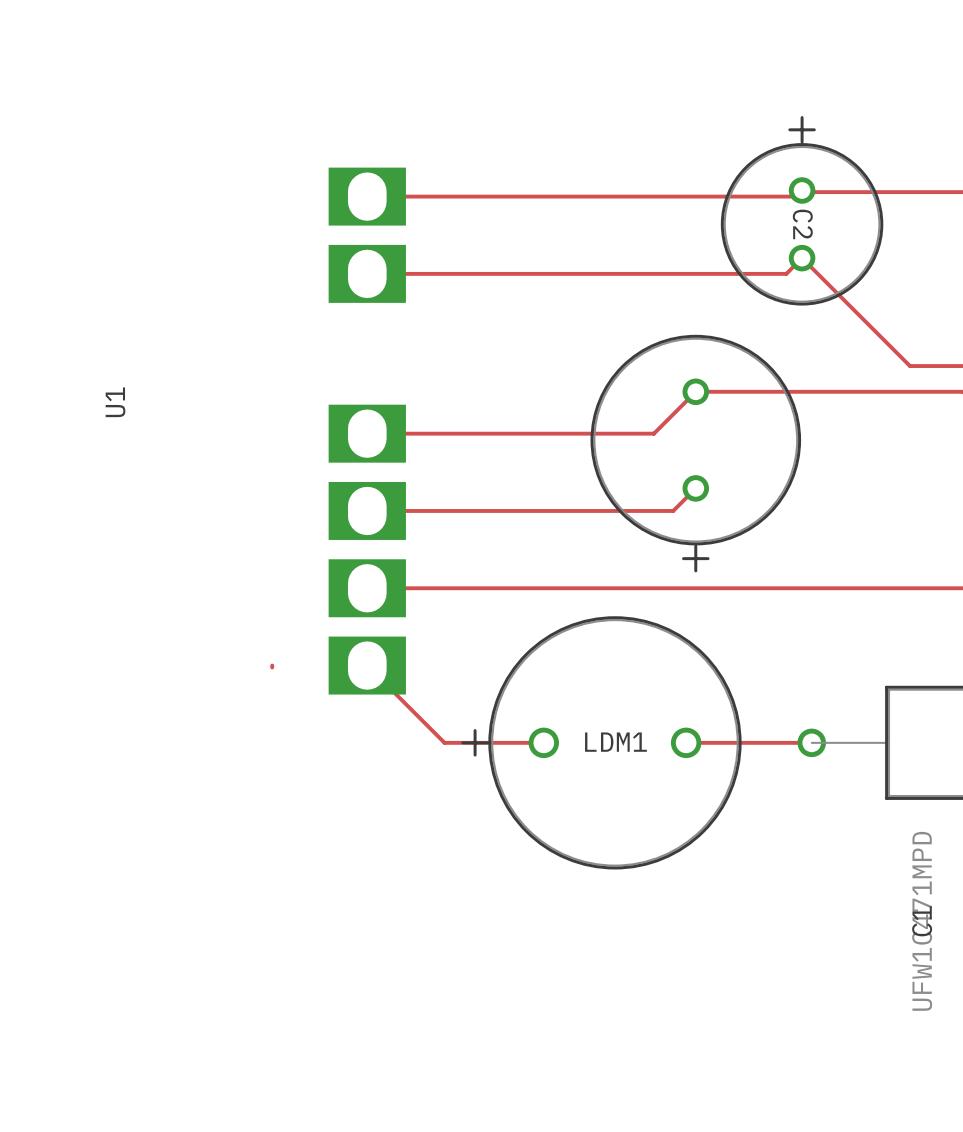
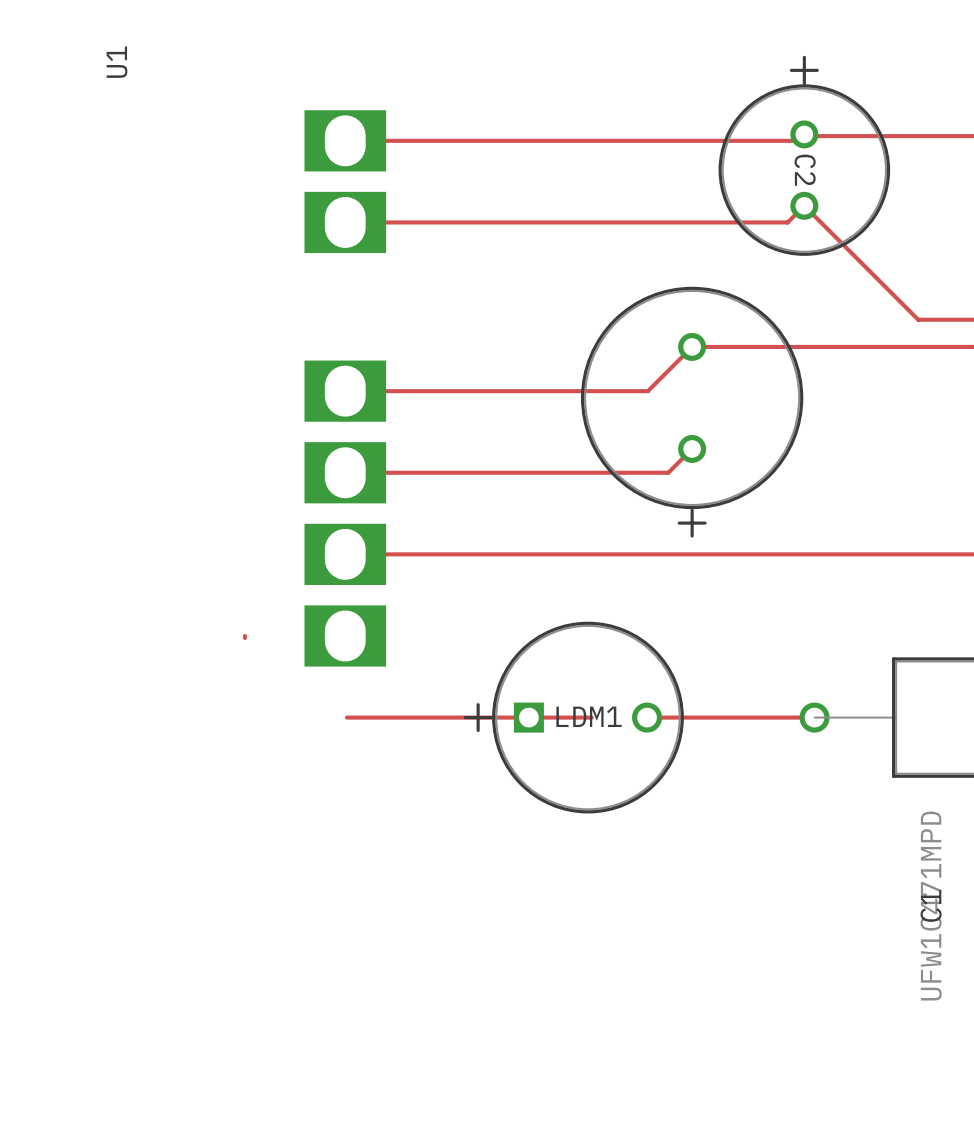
U1 name position: U1 (115, 402) -> U1 (117, 62)
LDM1 footprint: [461, 616, 742, 870] -> [463, 621, 684, 814]
track: (367, 665) (444, 742) -> (346, 717) (426, 717)
track: none -> (531, 717) (591, 717)
track: none -> (647, 717) (681, 717)

